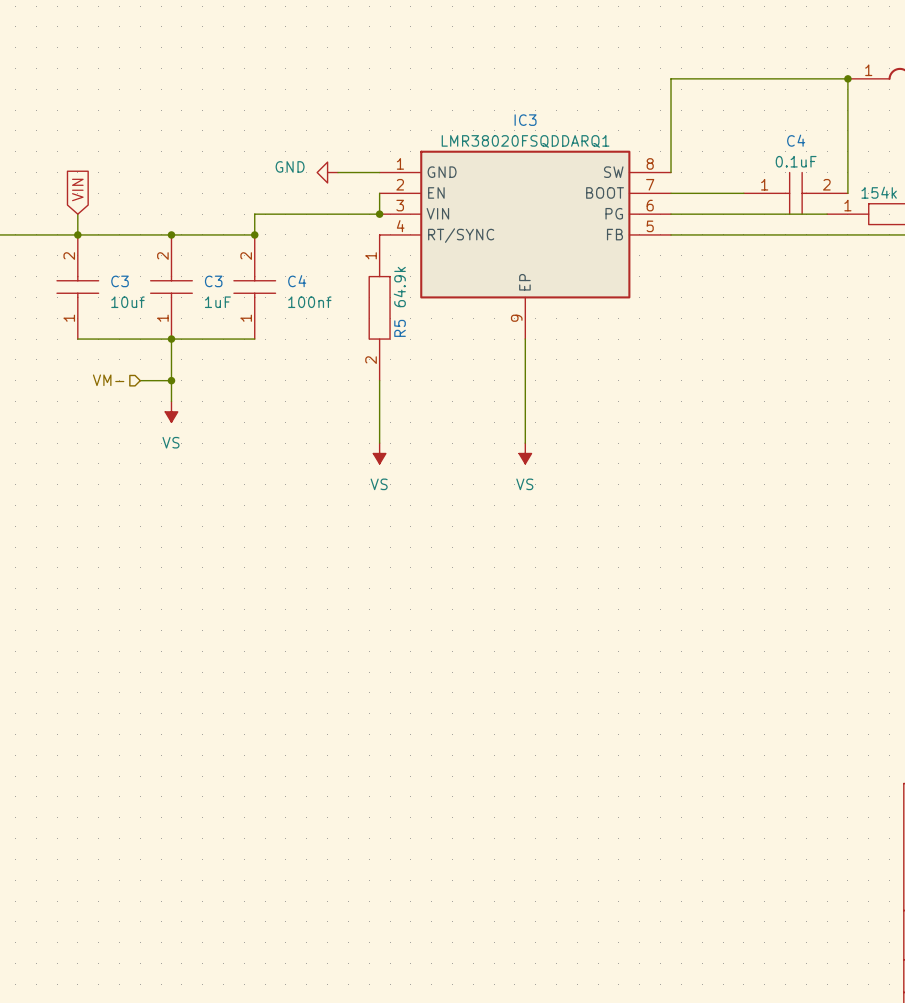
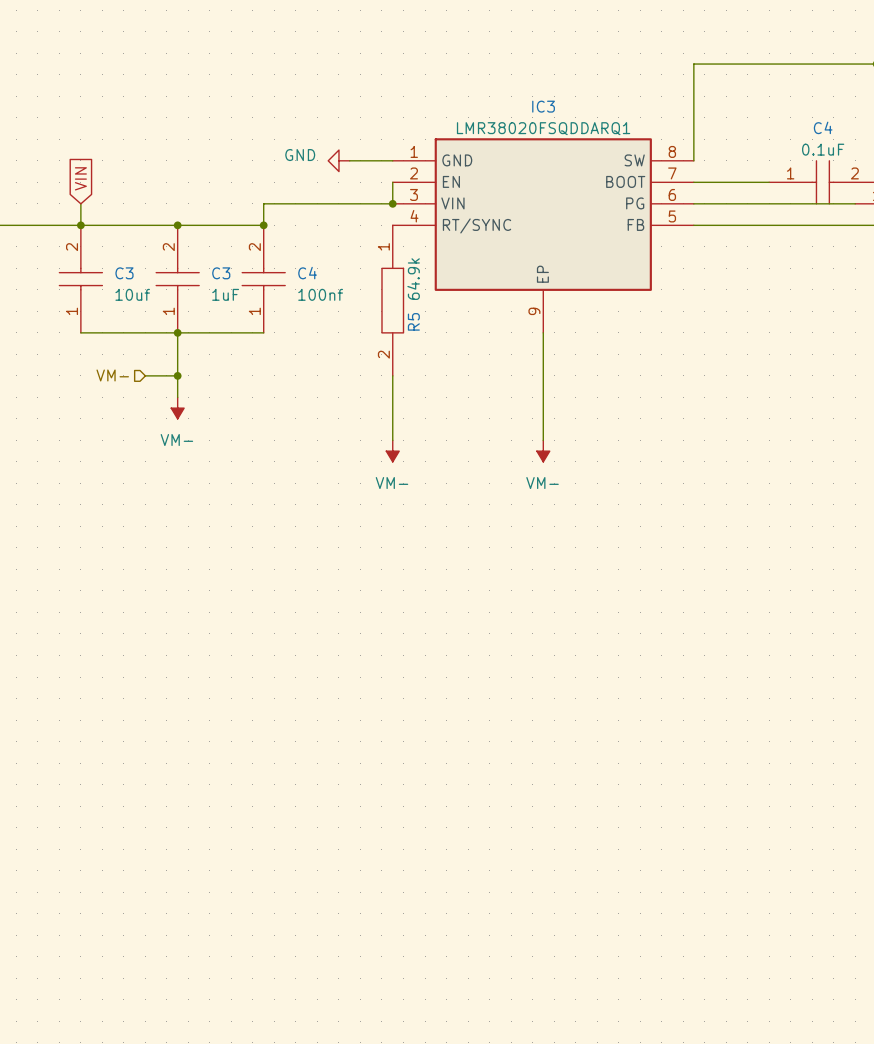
power symbol: VS (171, 411) -> VM- (177, 408)
power symbol: VS (379, 453) -> VM- (392, 451)
power symbol: VS (525, 453) -> VM- (543, 451)

